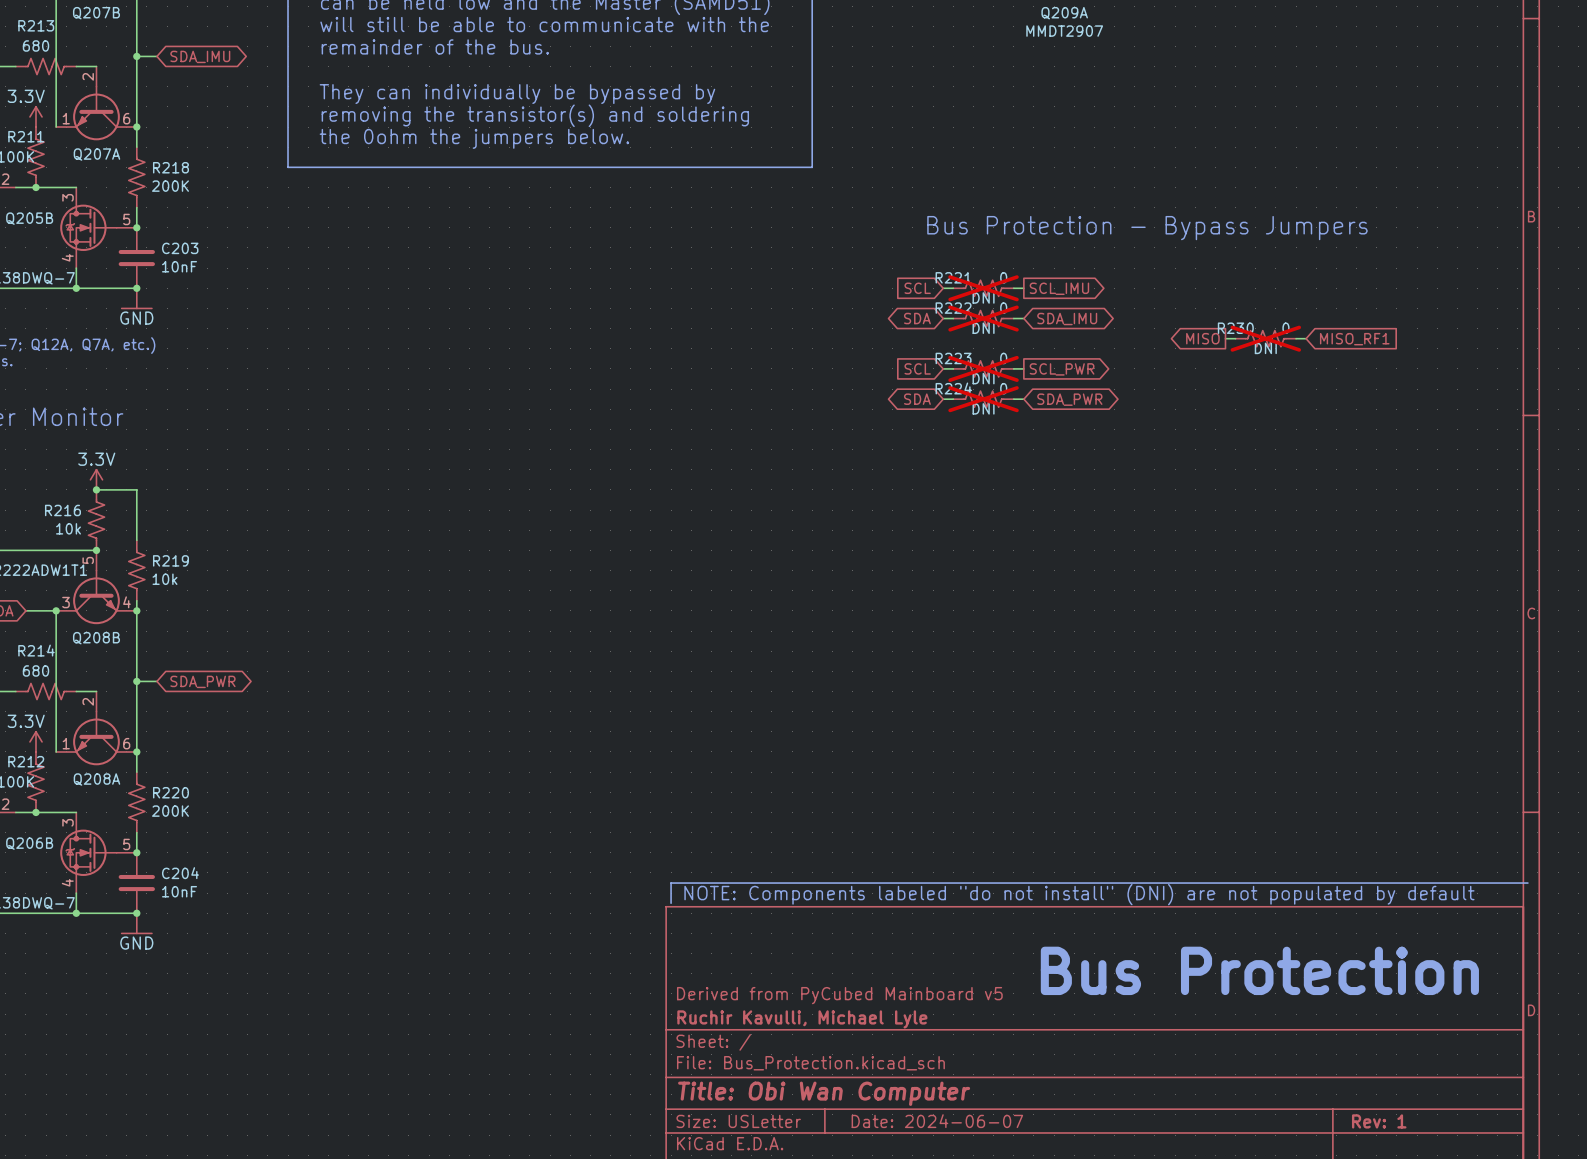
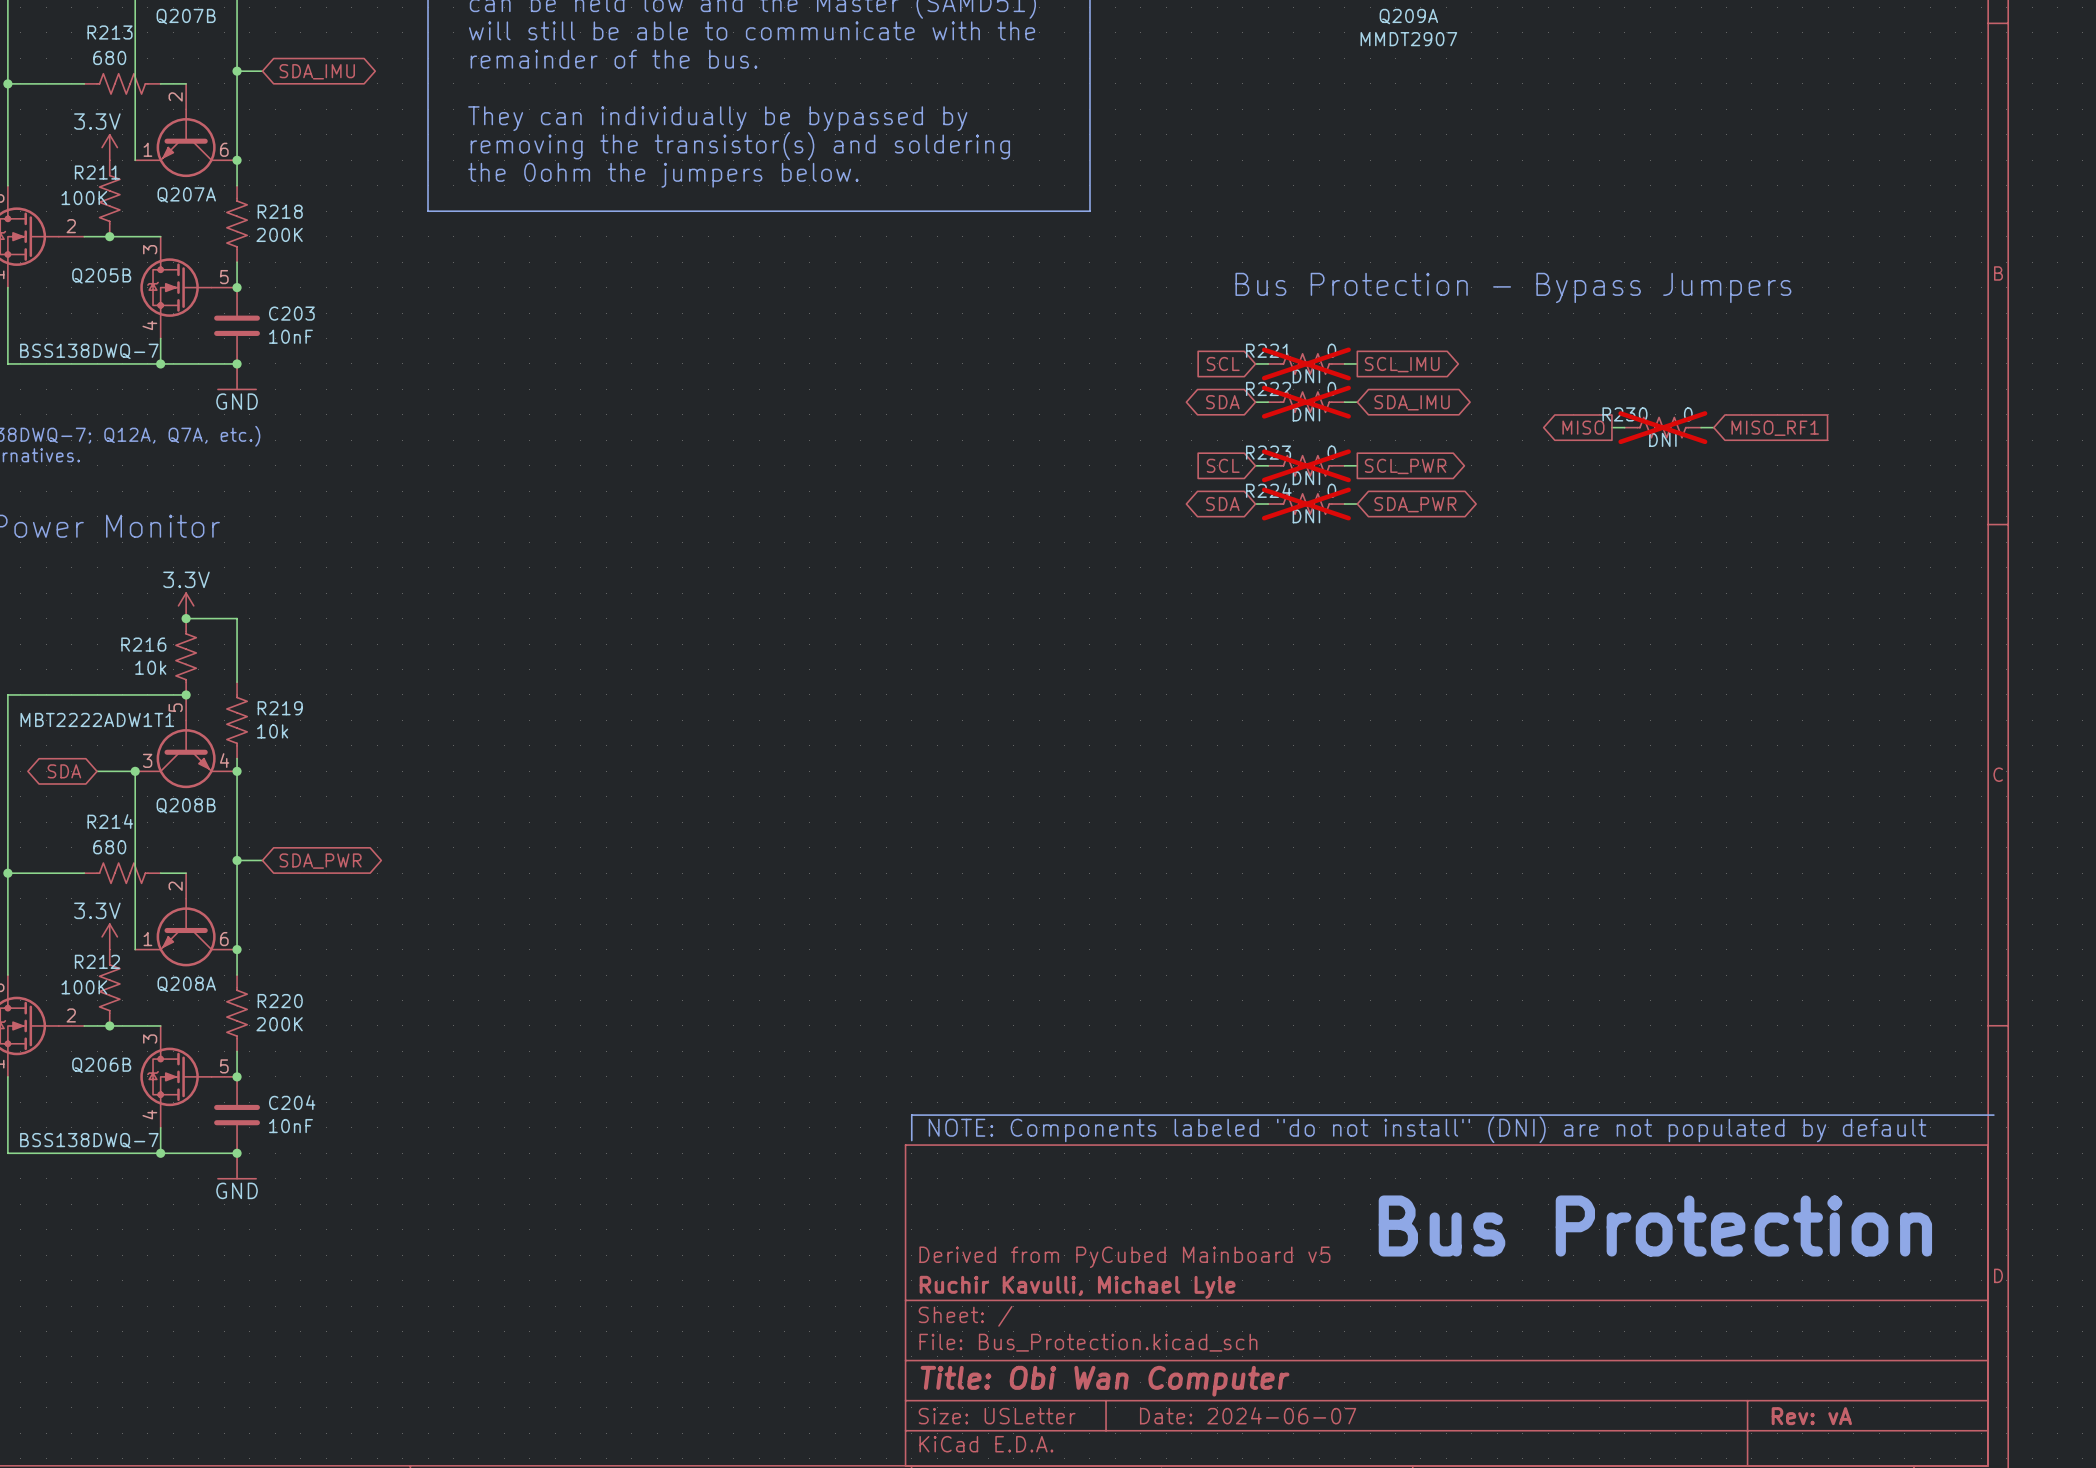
title block: Rev: 1 (1379, 1121) -> Rev: vA (1811, 1416)

